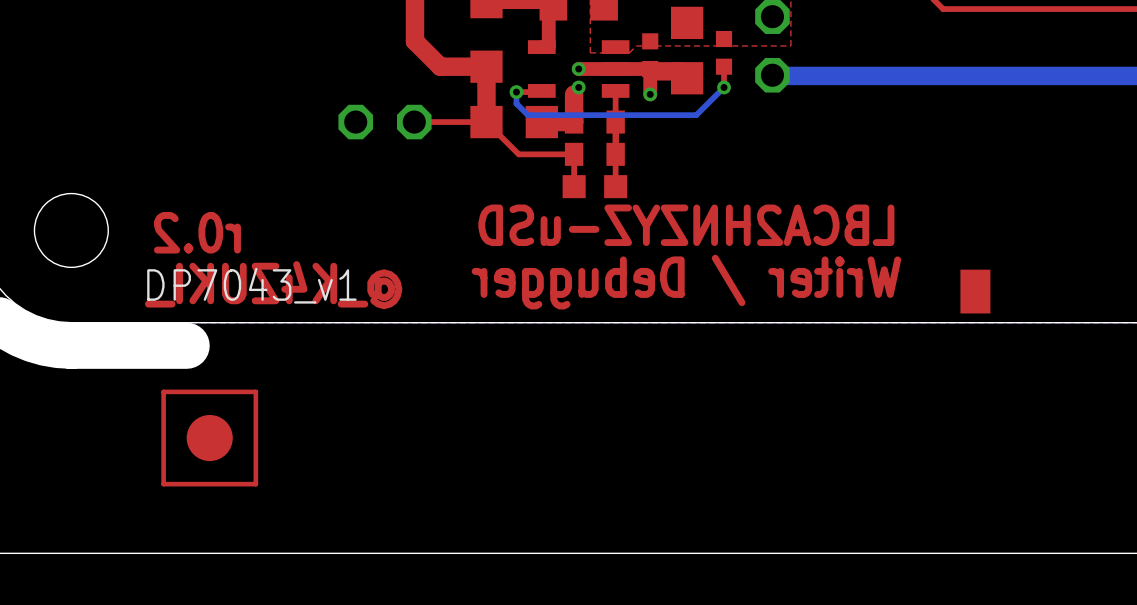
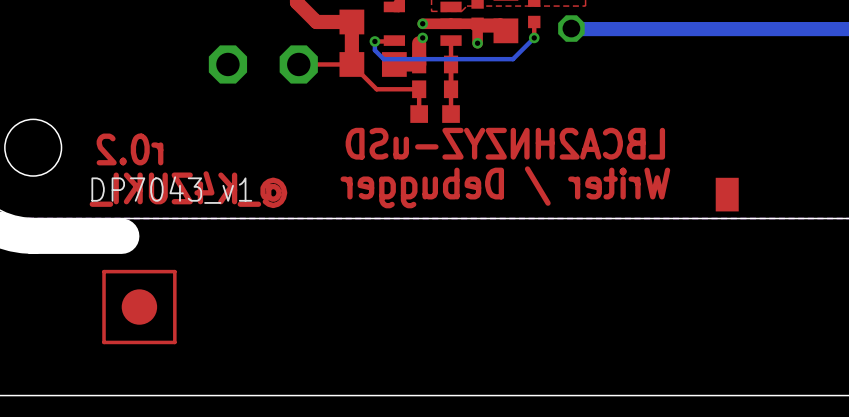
part: none -> (227, 64)
part: (385, 122) -> none
part: none -> (298, 64)

